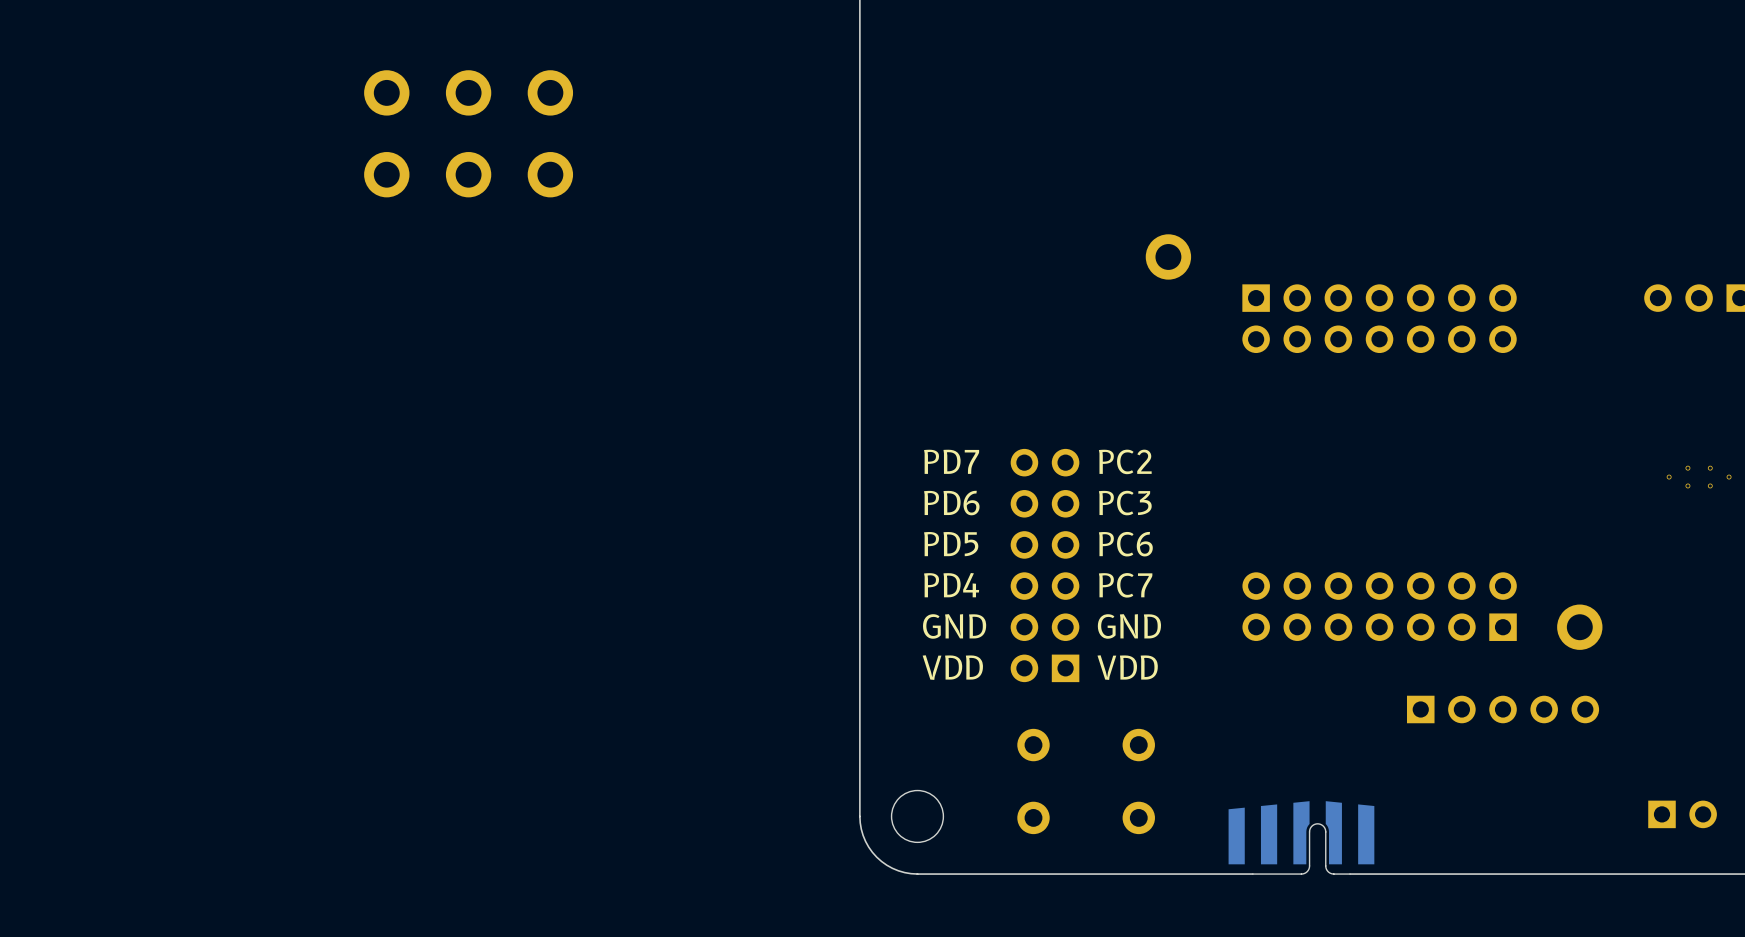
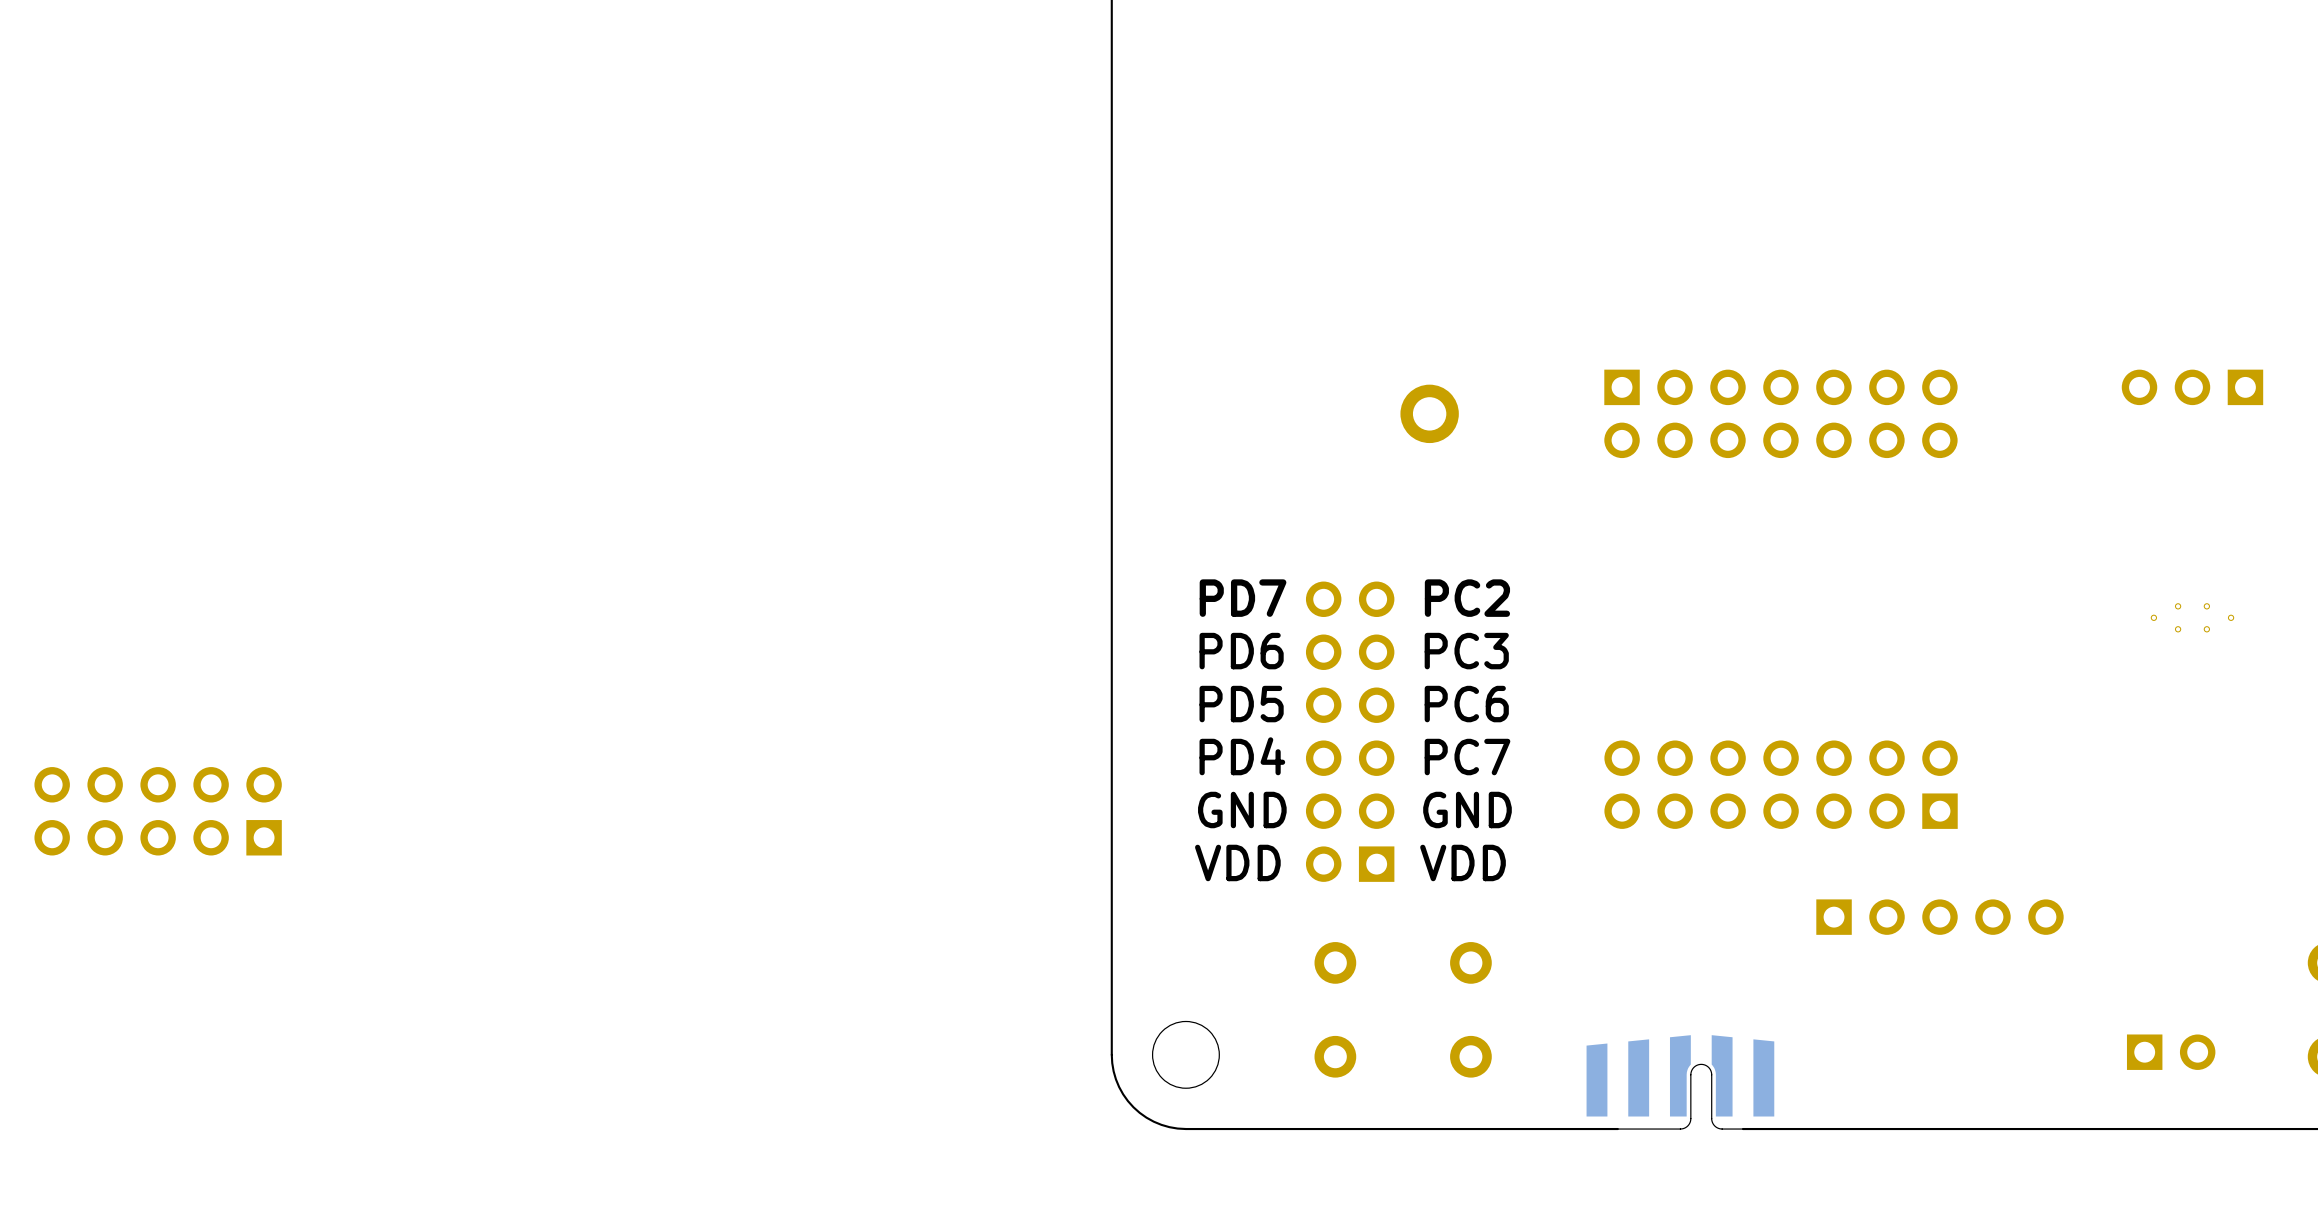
part: (386, 92) -> none
part: (468, 92) -> none
part: (550, 92) -> none
part: (386, 174) -> none
part: (468, 174) -> none
part: (550, 174) -> none
part position: (1168, 256) -> (1429, 413)
part: none -> (158, 811)
part: (1579, 627) -> none

